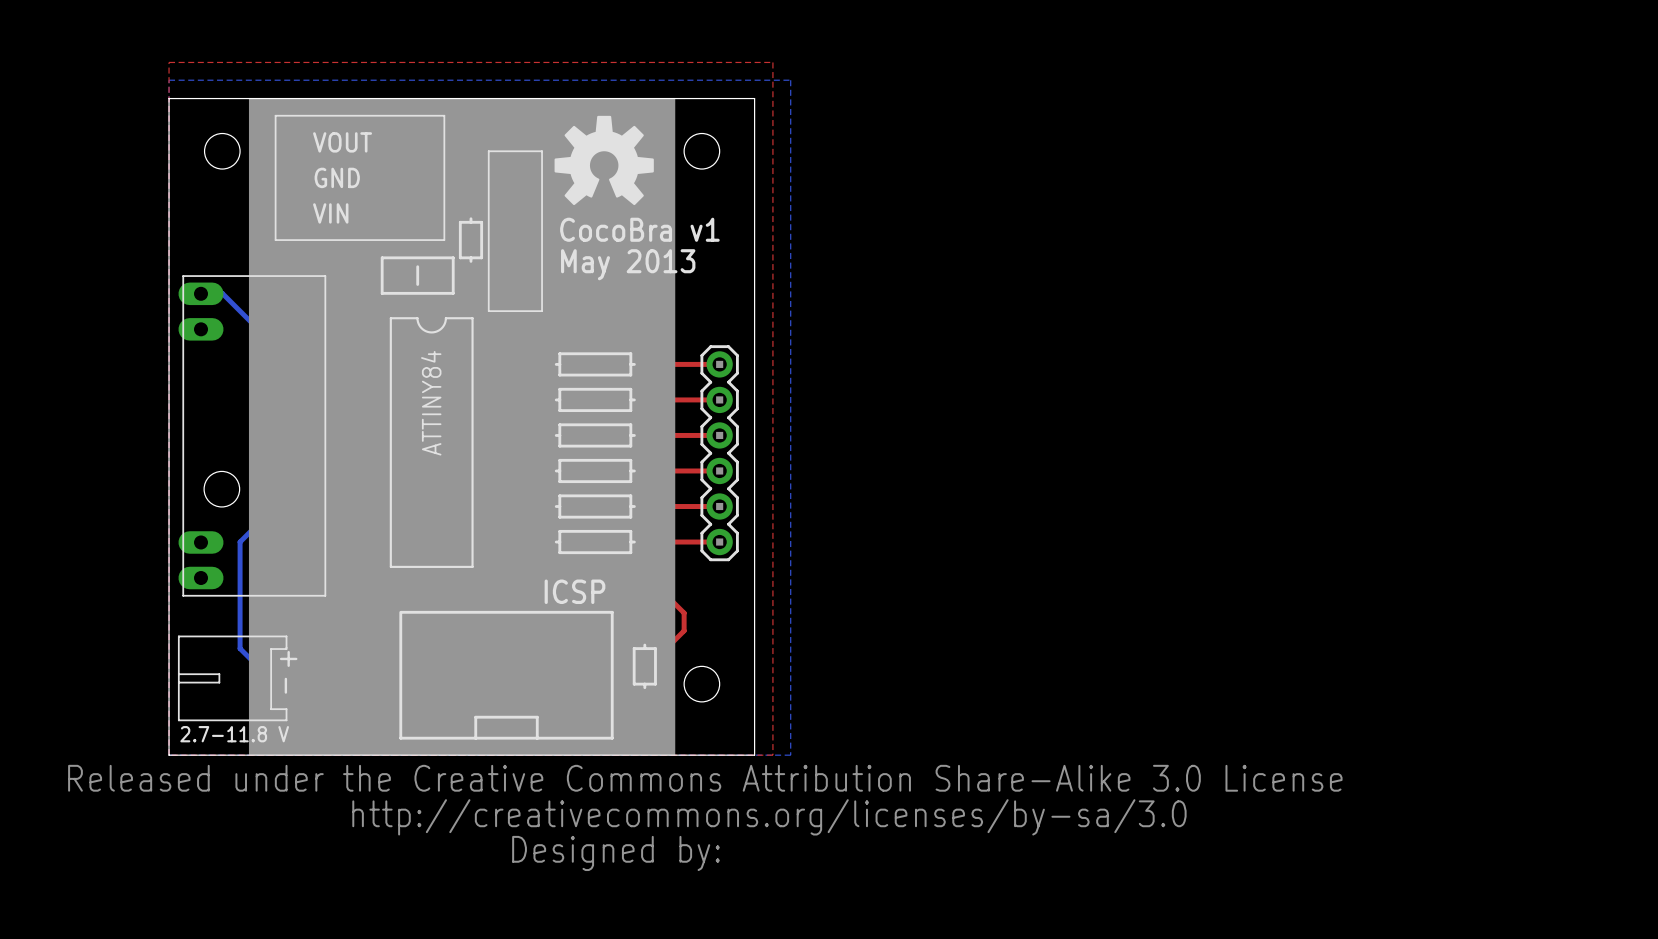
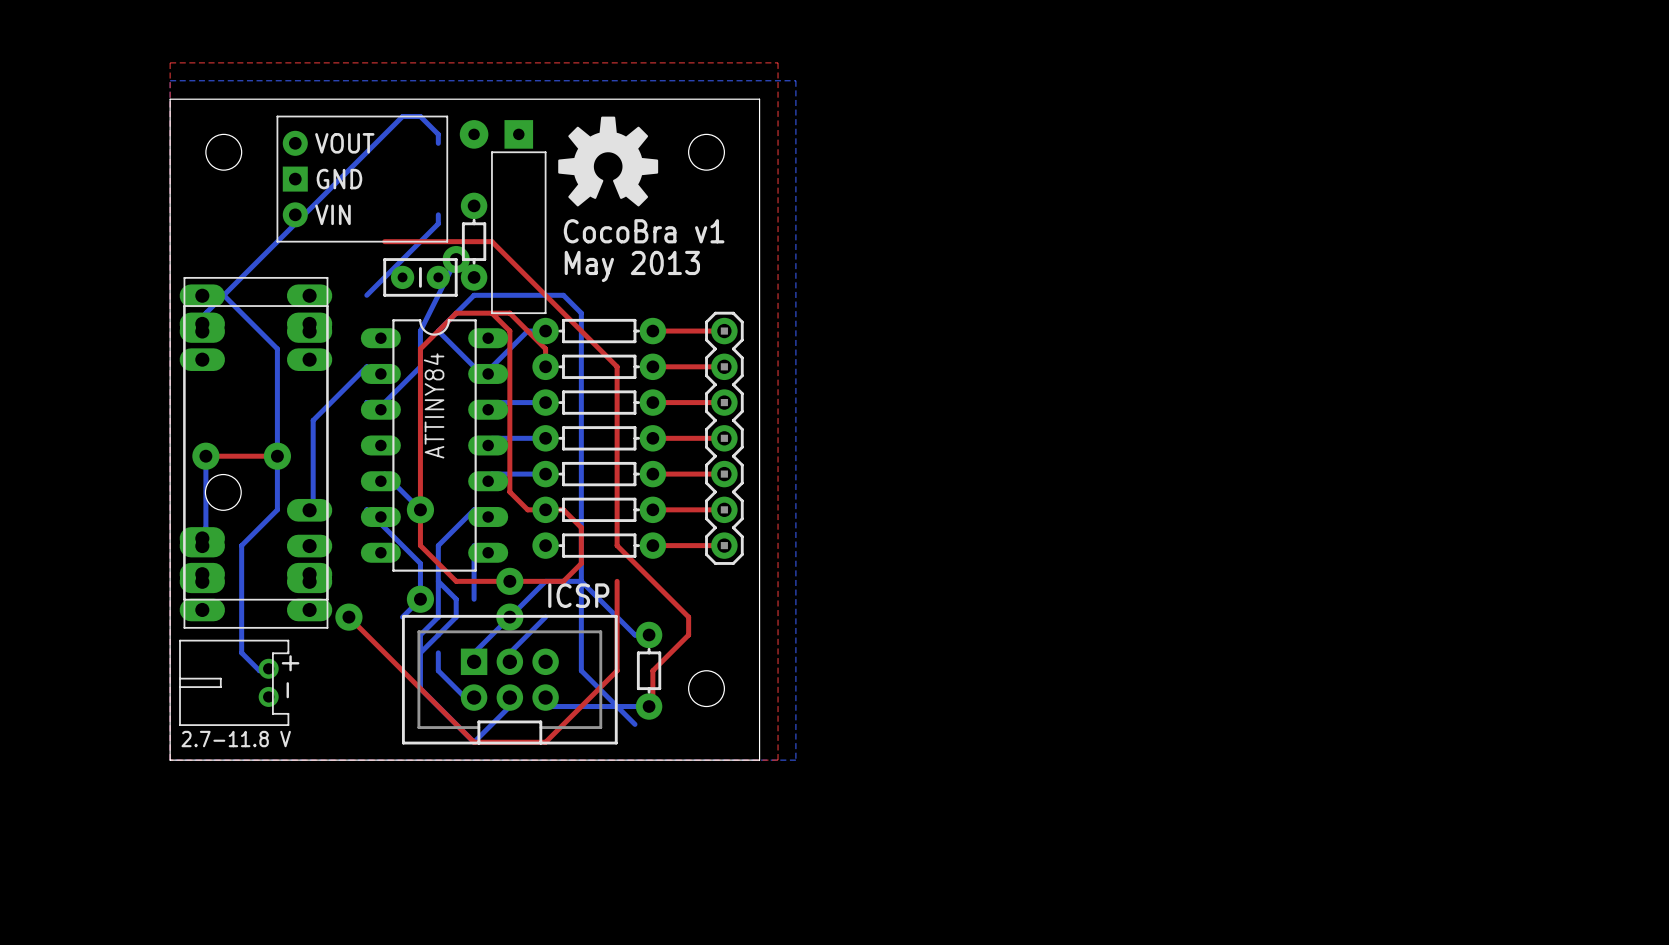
drawing: [248, 97, 676, 756] -> none
bottom track: none -> (438, 143) (438, 134) (420, 116) (402, 116) (205, 313) (202, 323)
bottom track: none -> (438, 214) (438, 223) (366, 295)
bottom track: none -> (456, 259) (420, 331) (420, 366) (384, 402) (366, 402) (366, 409)
via: none -> (456, 259)
bottom track: none -> (474, 295) (563, 295) (581, 313) (581, 670) (634, 724)
top track: none -> (491, 313) (509, 331) (509, 491) (527, 509) (545, 509)
bottom track: none -> (545, 331) (527, 331) (491, 366) (474, 366) (474, 373)
part: none -> (599, 331)
top track: none -> (652, 331) (724, 331)
top track: none -> (420, 384) (420, 509)
part: none -> (724, 438)
bottom track: none -> (205, 456) (205, 527) (202, 538)
top track: none -> (205, 456) (277, 456)
via: none -> (205, 456)
via: none -> (277, 456)
part: (719, 453) -> none
part: none -> (255, 466)
bottom track: none -> (366, 516) (366, 509) (420, 563) (420, 599) (402, 617)
bottom track: none -> (438, 581) (438, 617) (420, 634) (420, 652)
via: none -> (509, 581)
via: none -> (509, 617)

